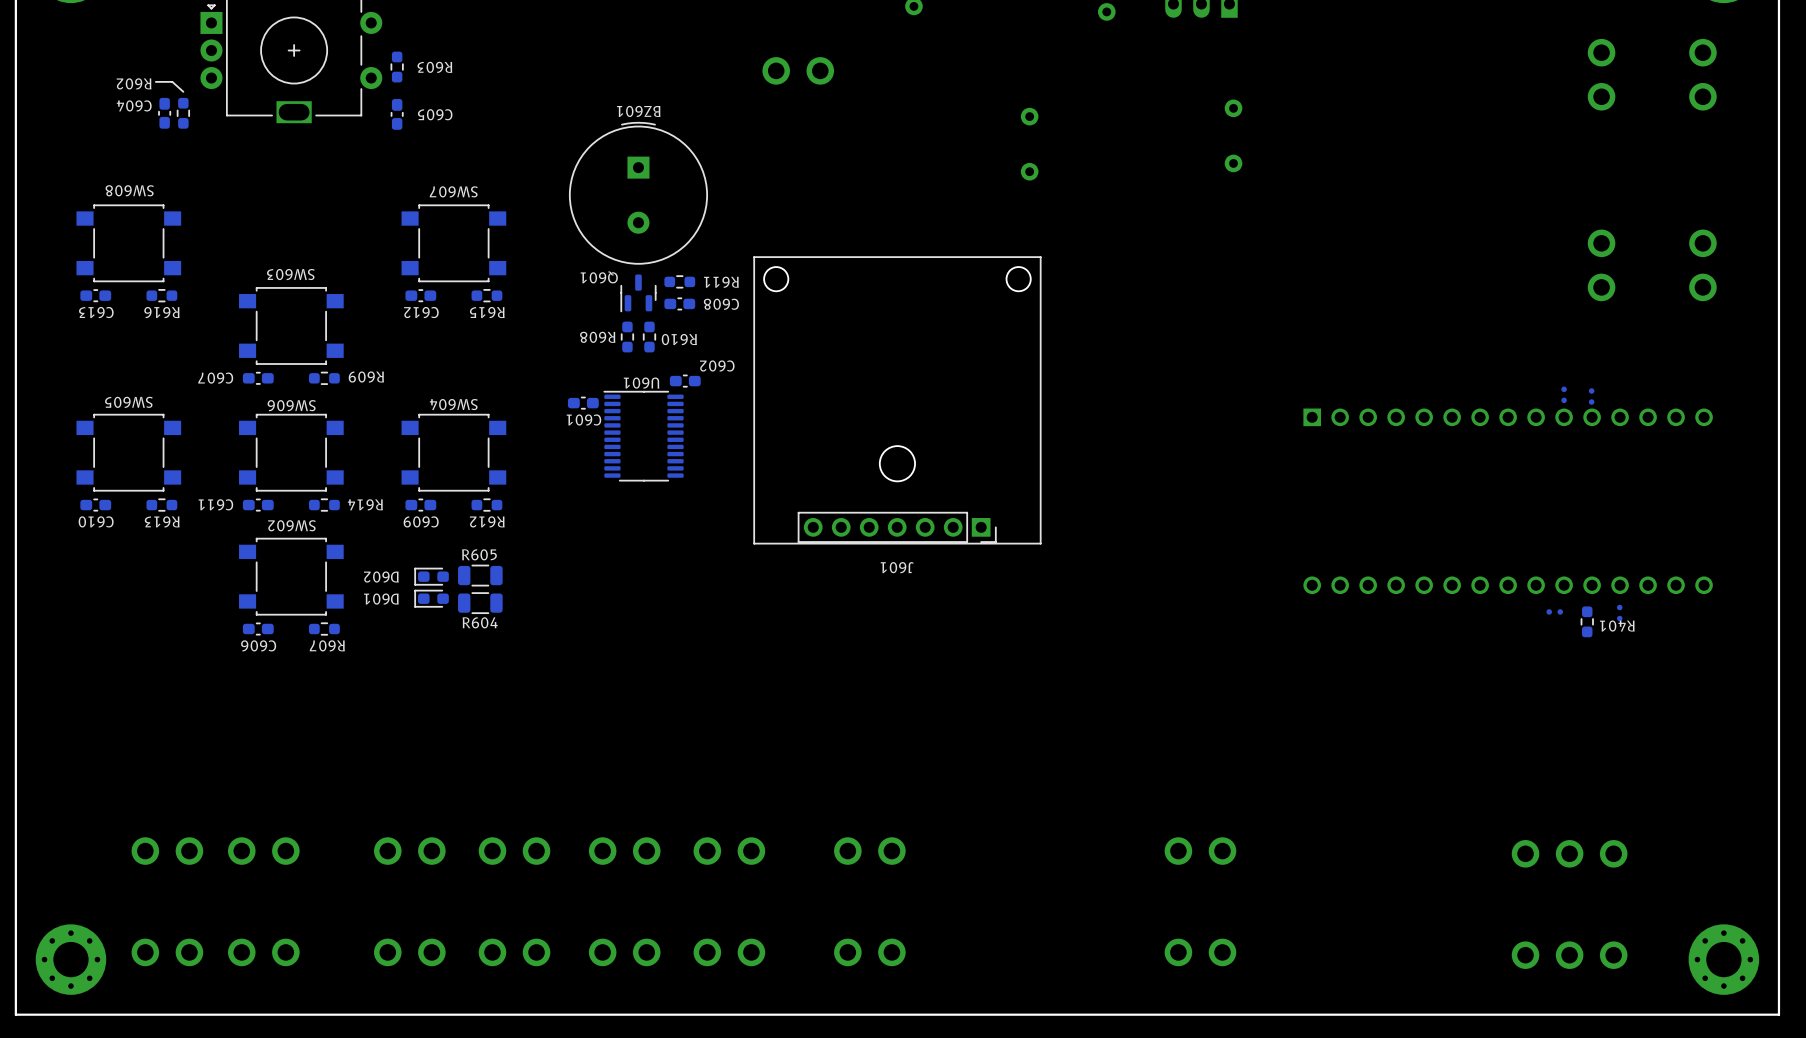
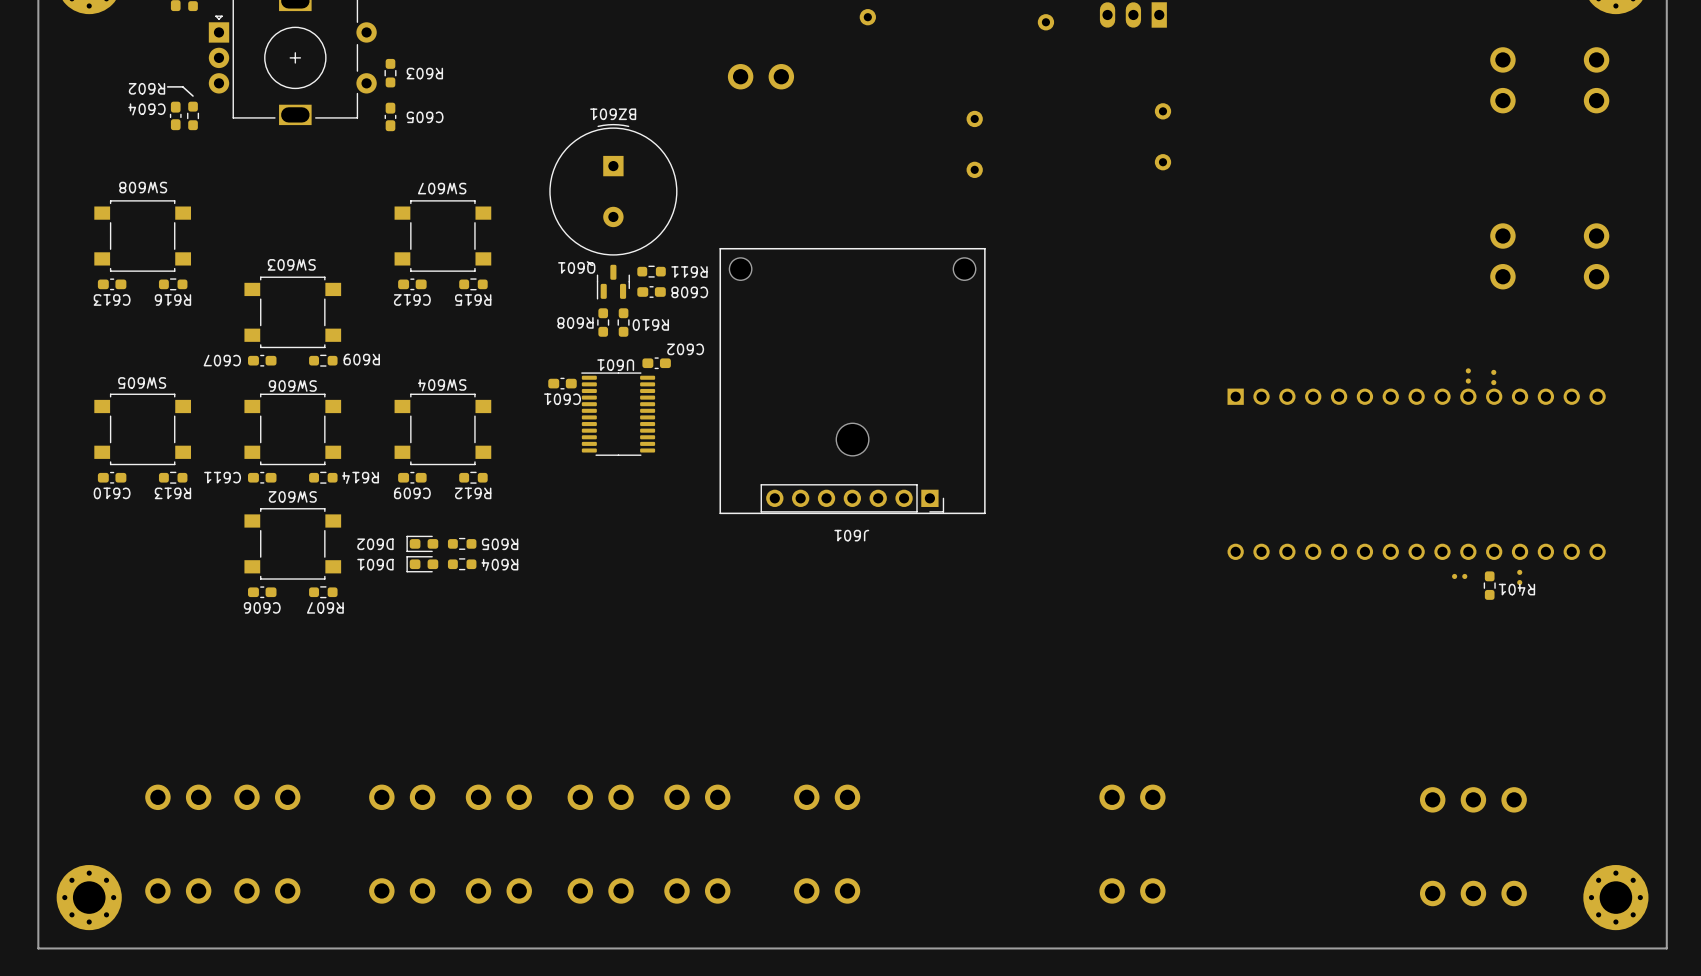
R605 name position: R605 (479, 554) -> R605 (500, 544)
R605 footprint: [458, 564, 503, 587] -> [447, 537, 477, 550]
R604 footprint: [458, 592, 503, 614] -> [447, 558, 477, 571]
R604 name position: R604 (480, 622) -> R604 (499, 564)

